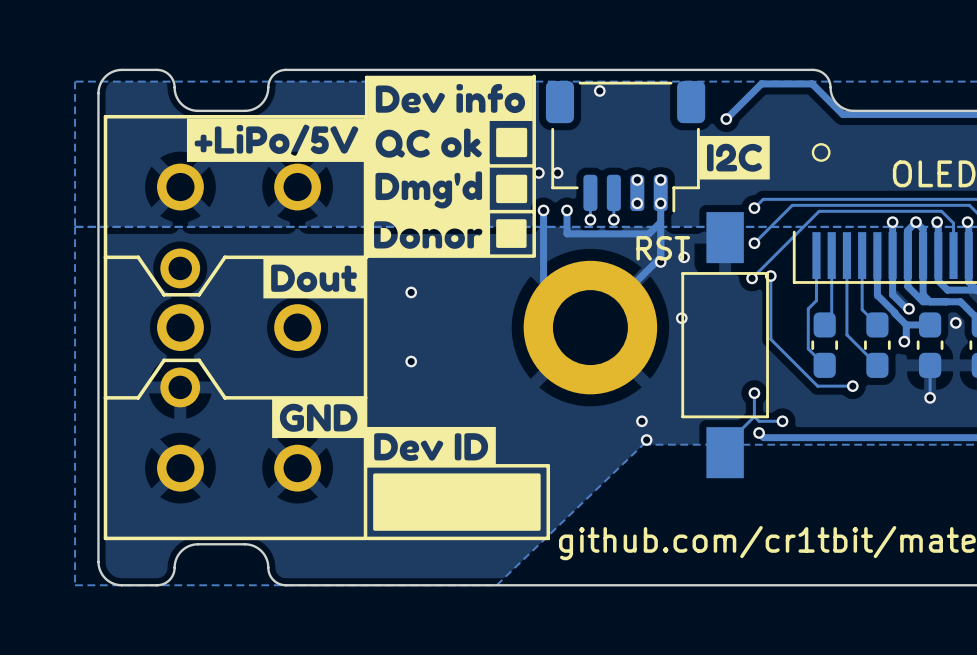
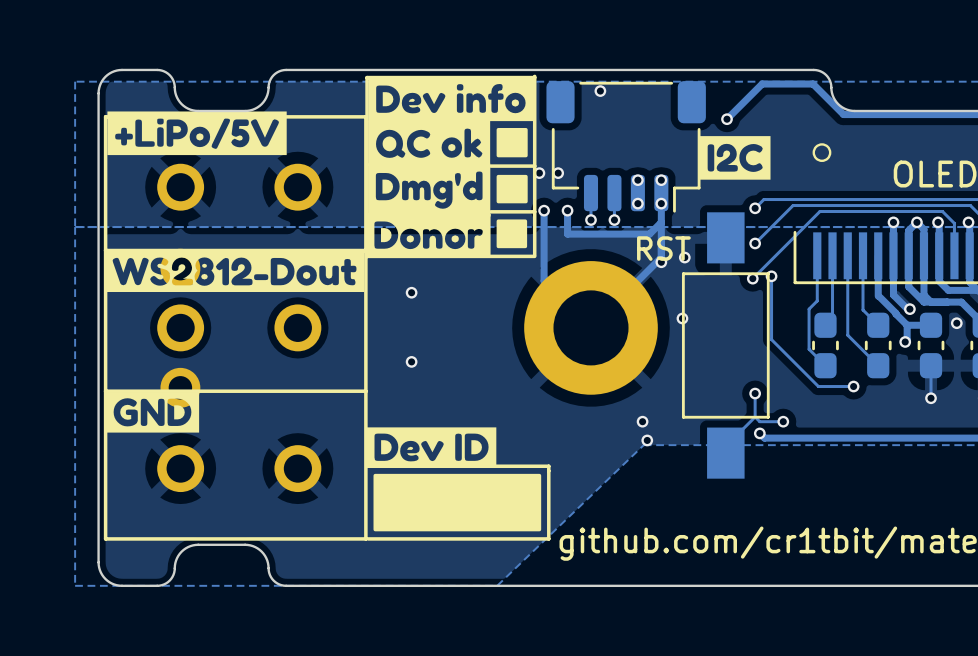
drawing position: (276, 140) -> (197, 133)
drawing: none -> [104, 251, 365, 293]
line: none -> (367, 250) (105, 250)
line: (366, 257) (224, 257) (199, 294) (164, 294) (138, 257) (105, 257) -> none
drawing: [263, 258, 365, 299] -> none
line: none -> (365, 391) (105, 391)
line: (365, 397) (224, 397) (199, 360) (164, 360) (138, 397) (105, 397) -> none
drawing position: (318, 417) -> (152, 412)

